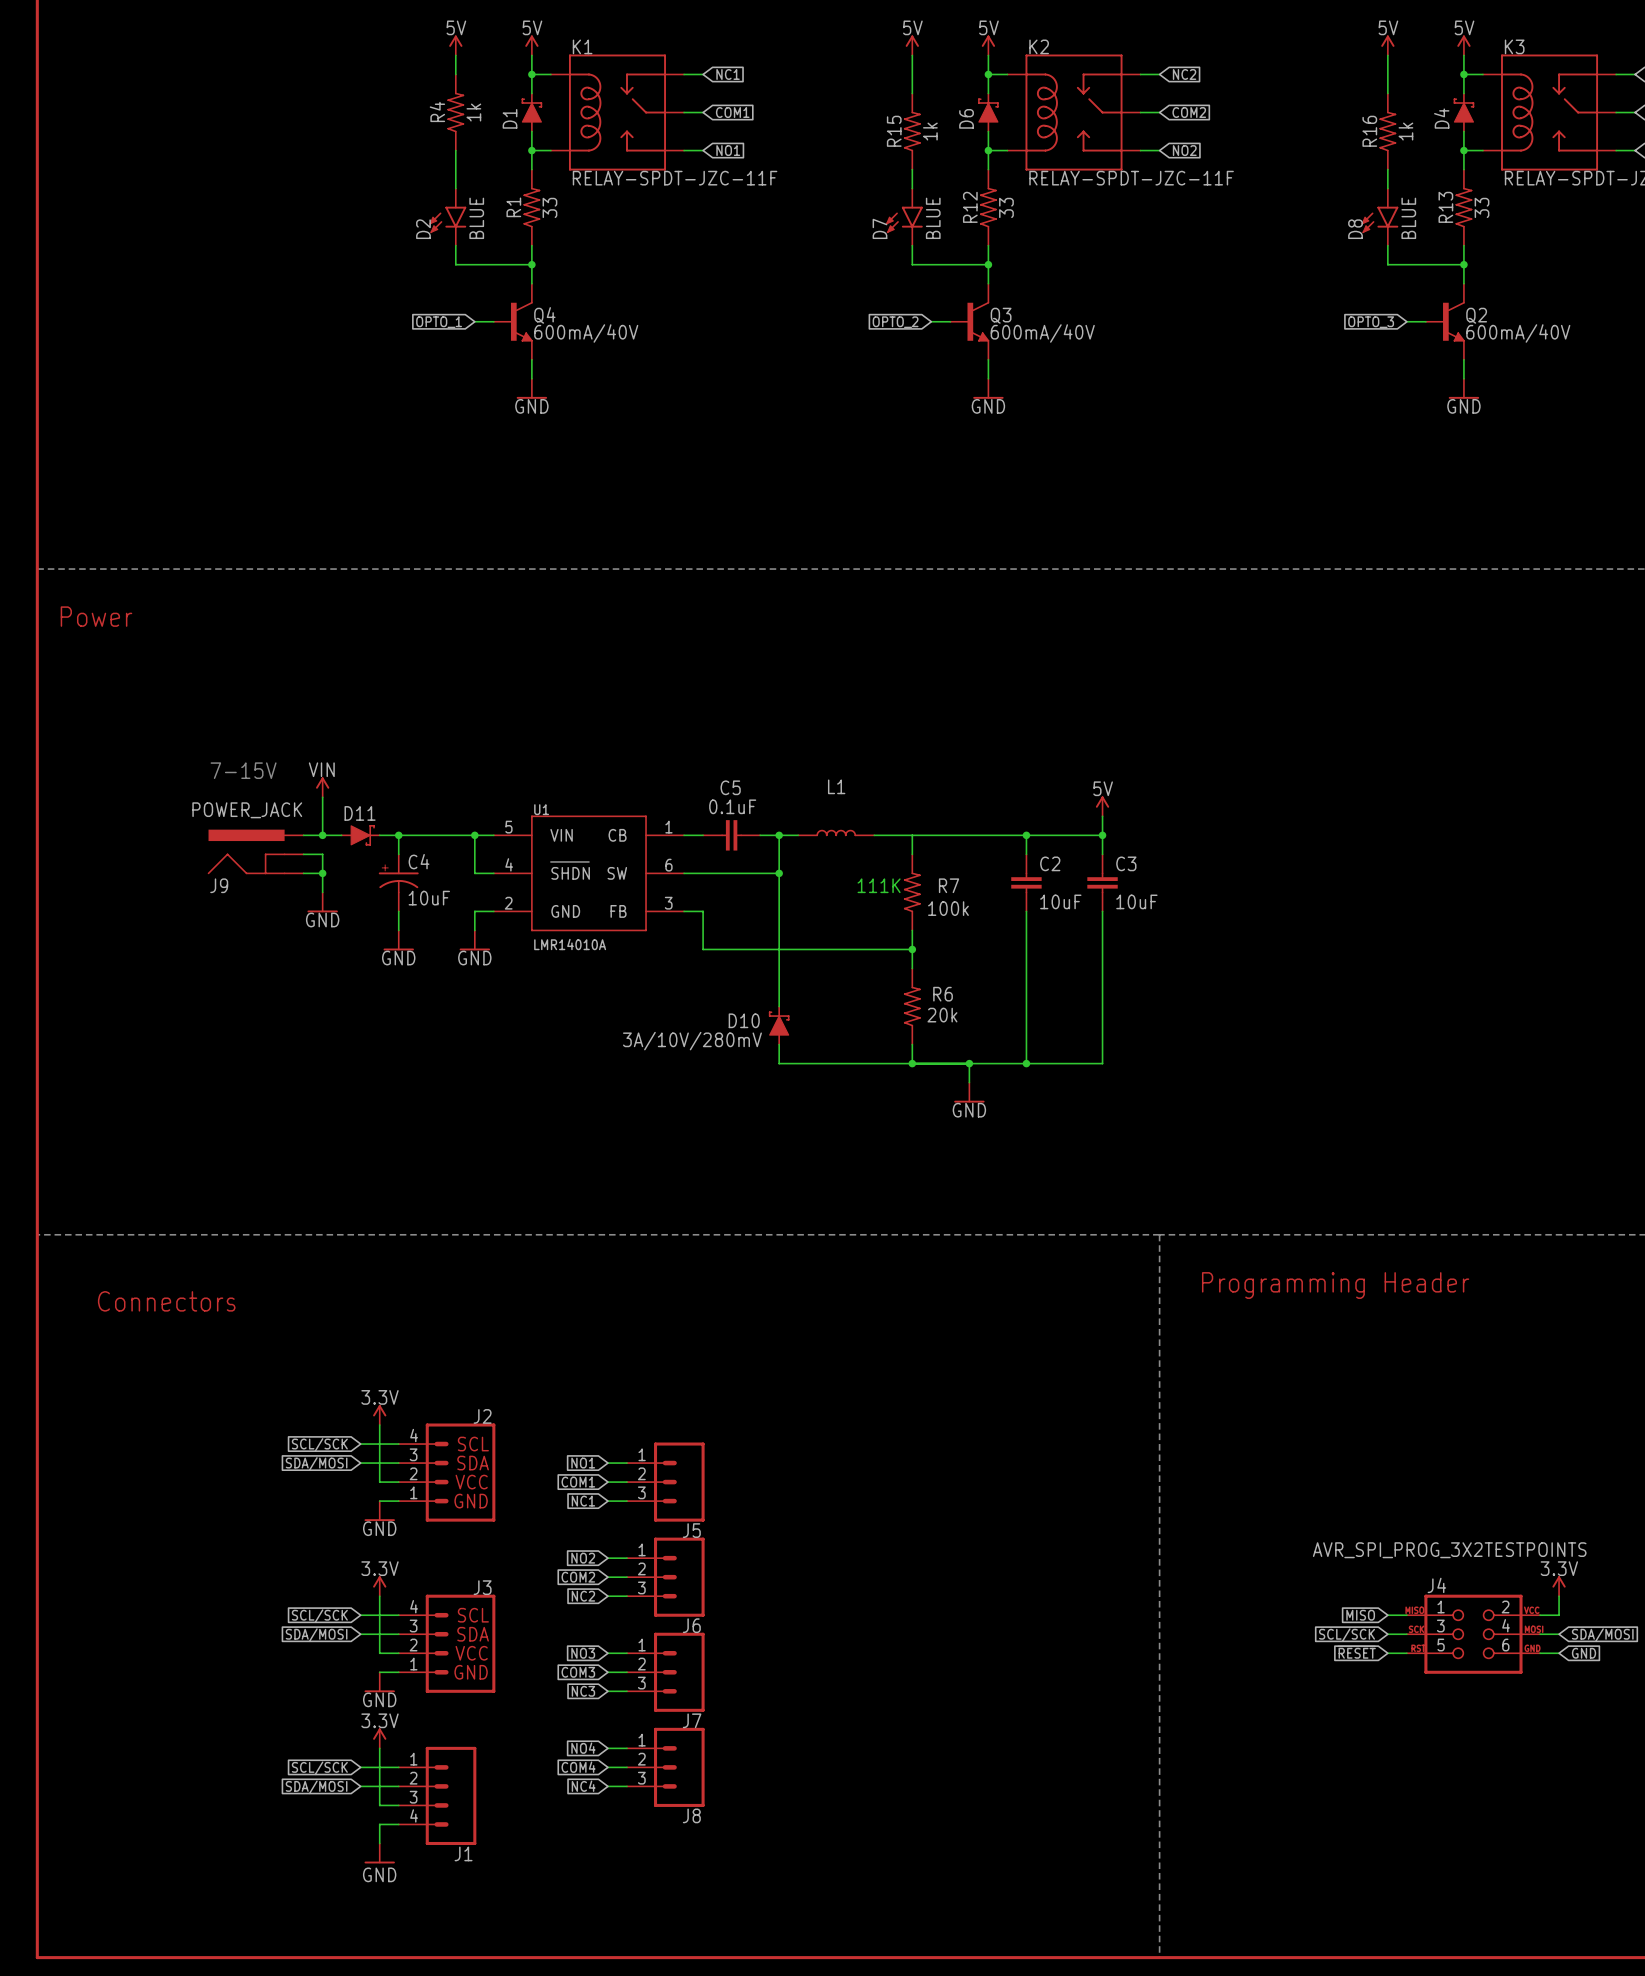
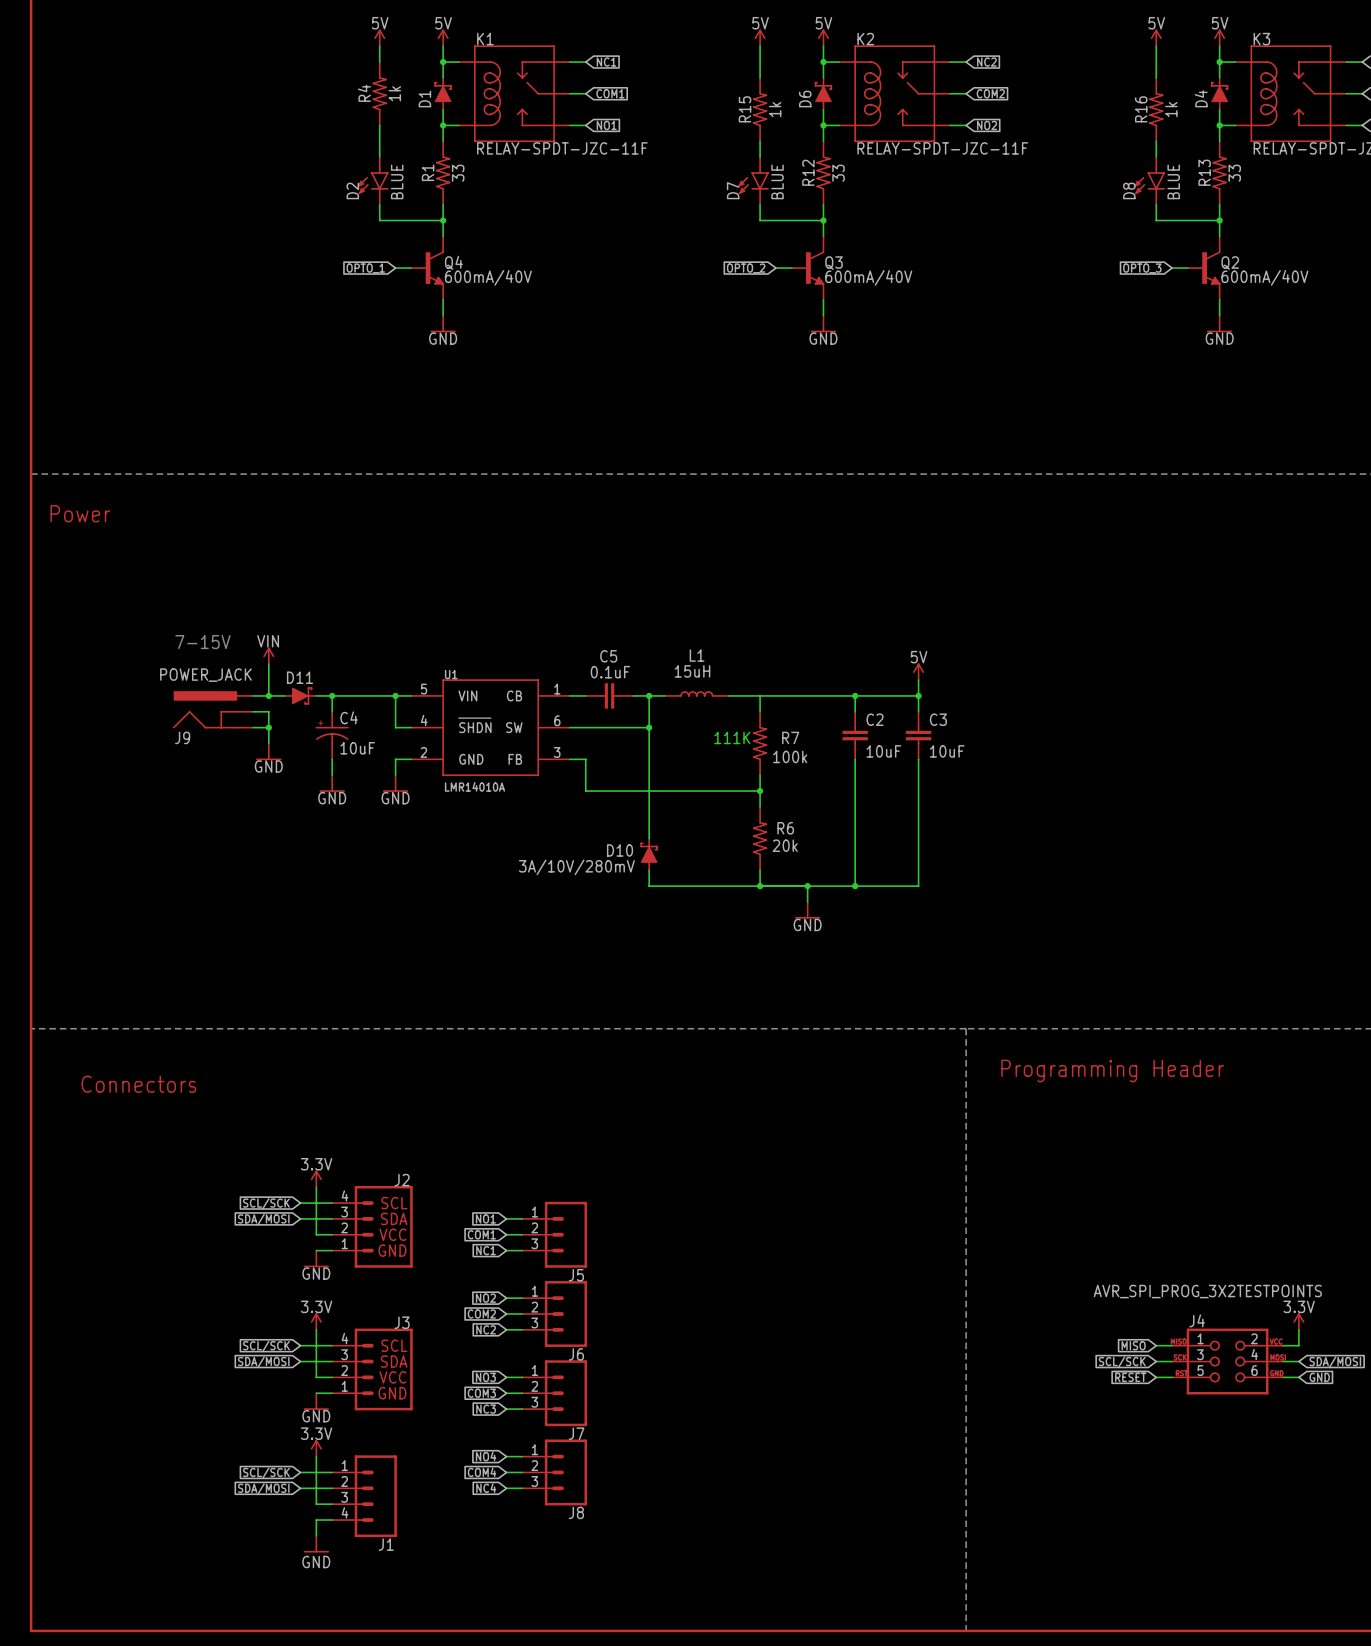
L1 value: none -> 15uH (692, 671)

